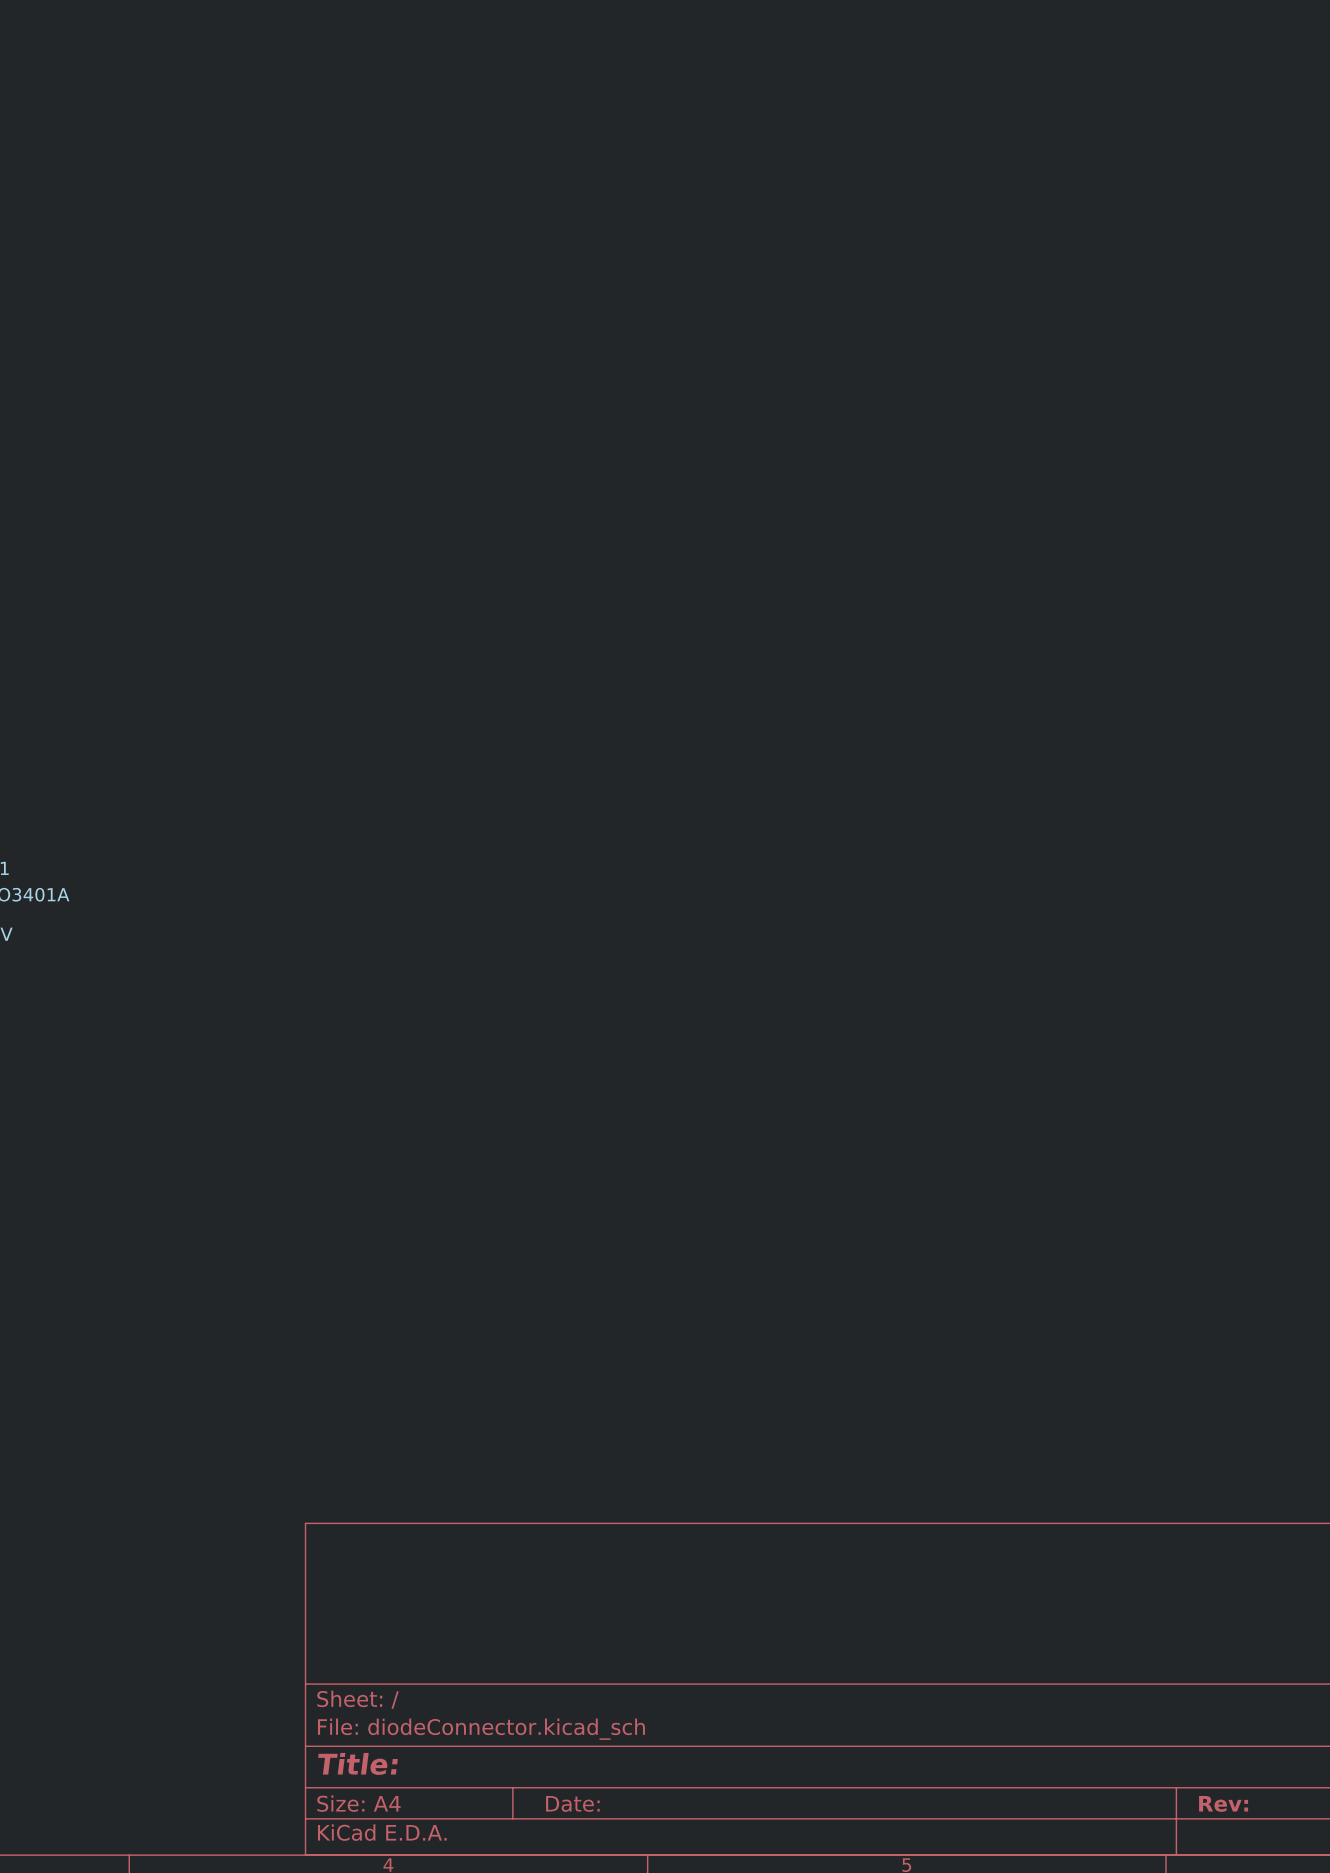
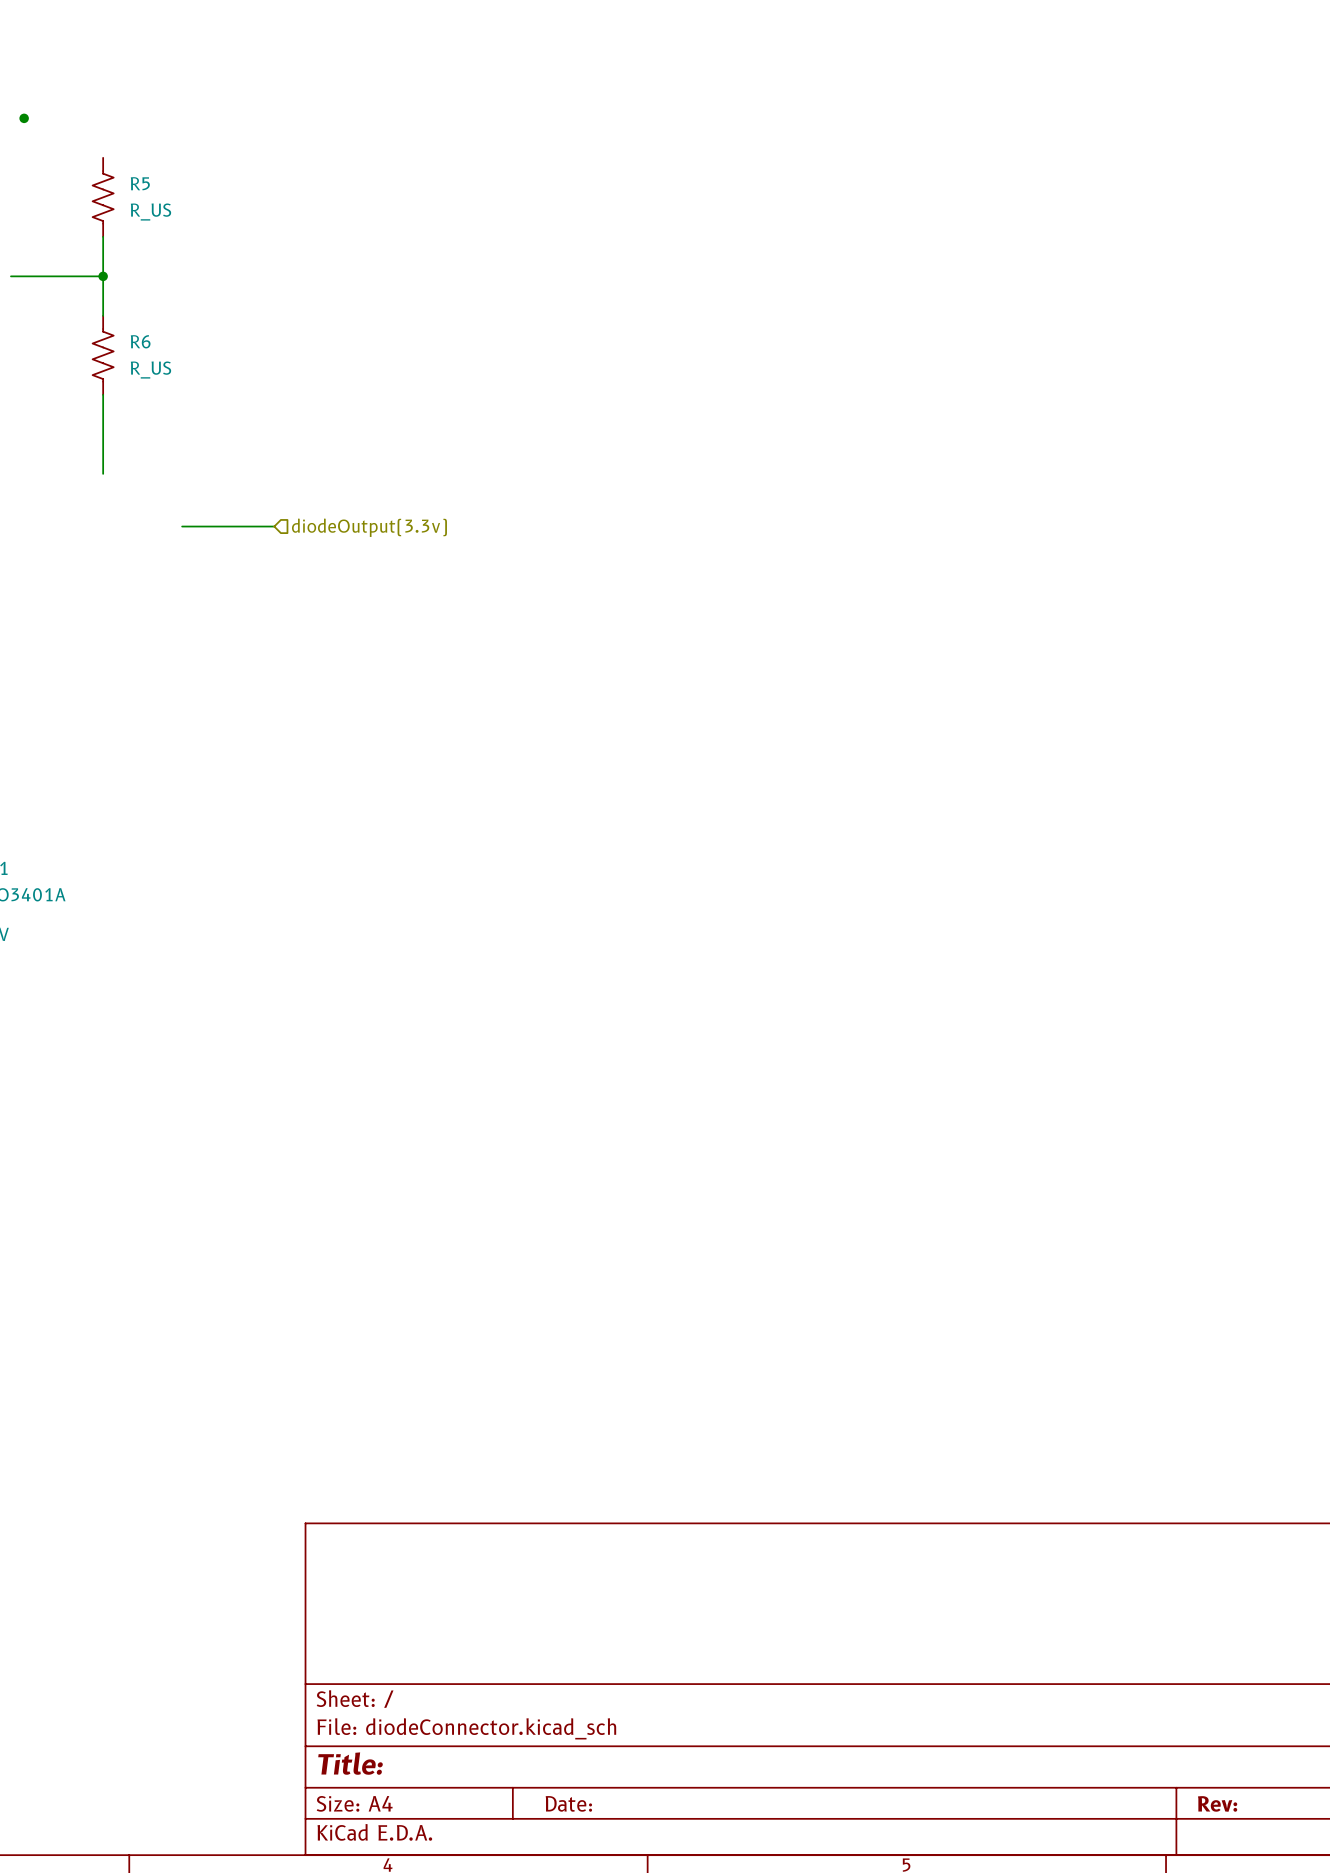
junction: none -> (24, 118)
R5: none -> R_US (103, 197)
wire: none -> (103, 236) (103, 315)
wire: none -> (10, 276) (103, 276)
junction: none -> (103, 276)
R6: none -> R_US (103, 355)
wire: none -> (103, 394) (103, 473)
wire: none -> (182, 526) (274, 526)
hierarchical label: none -> diodeOutput(3.3v) (369, 527)

